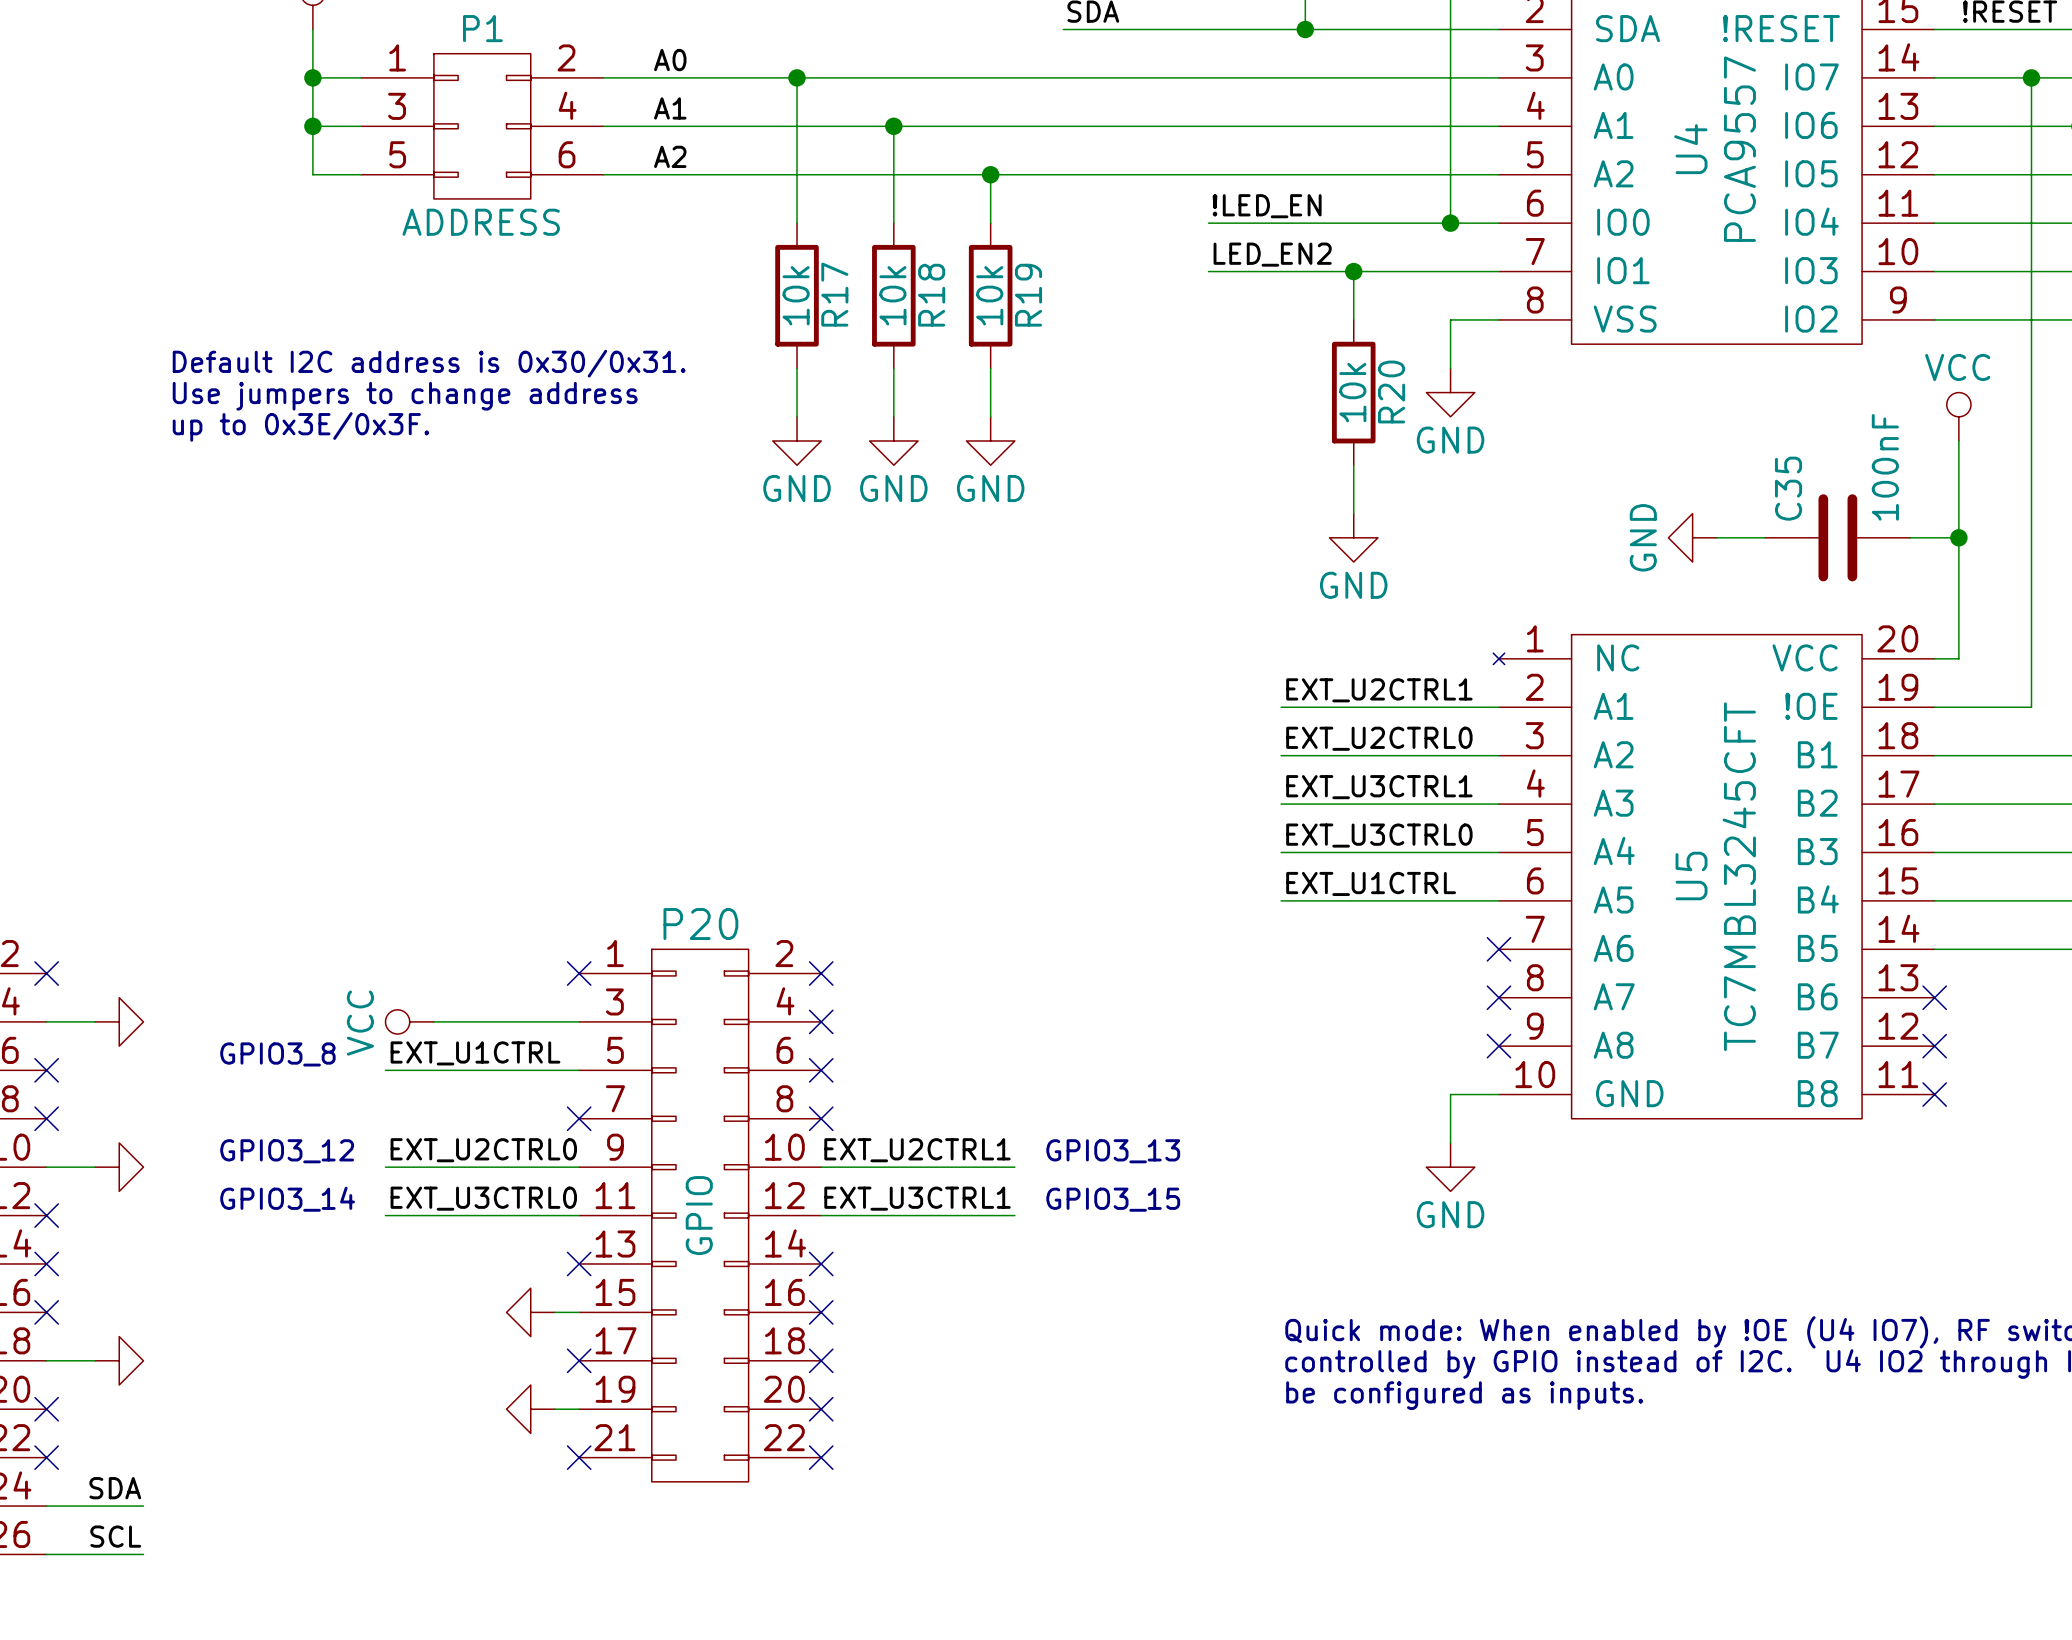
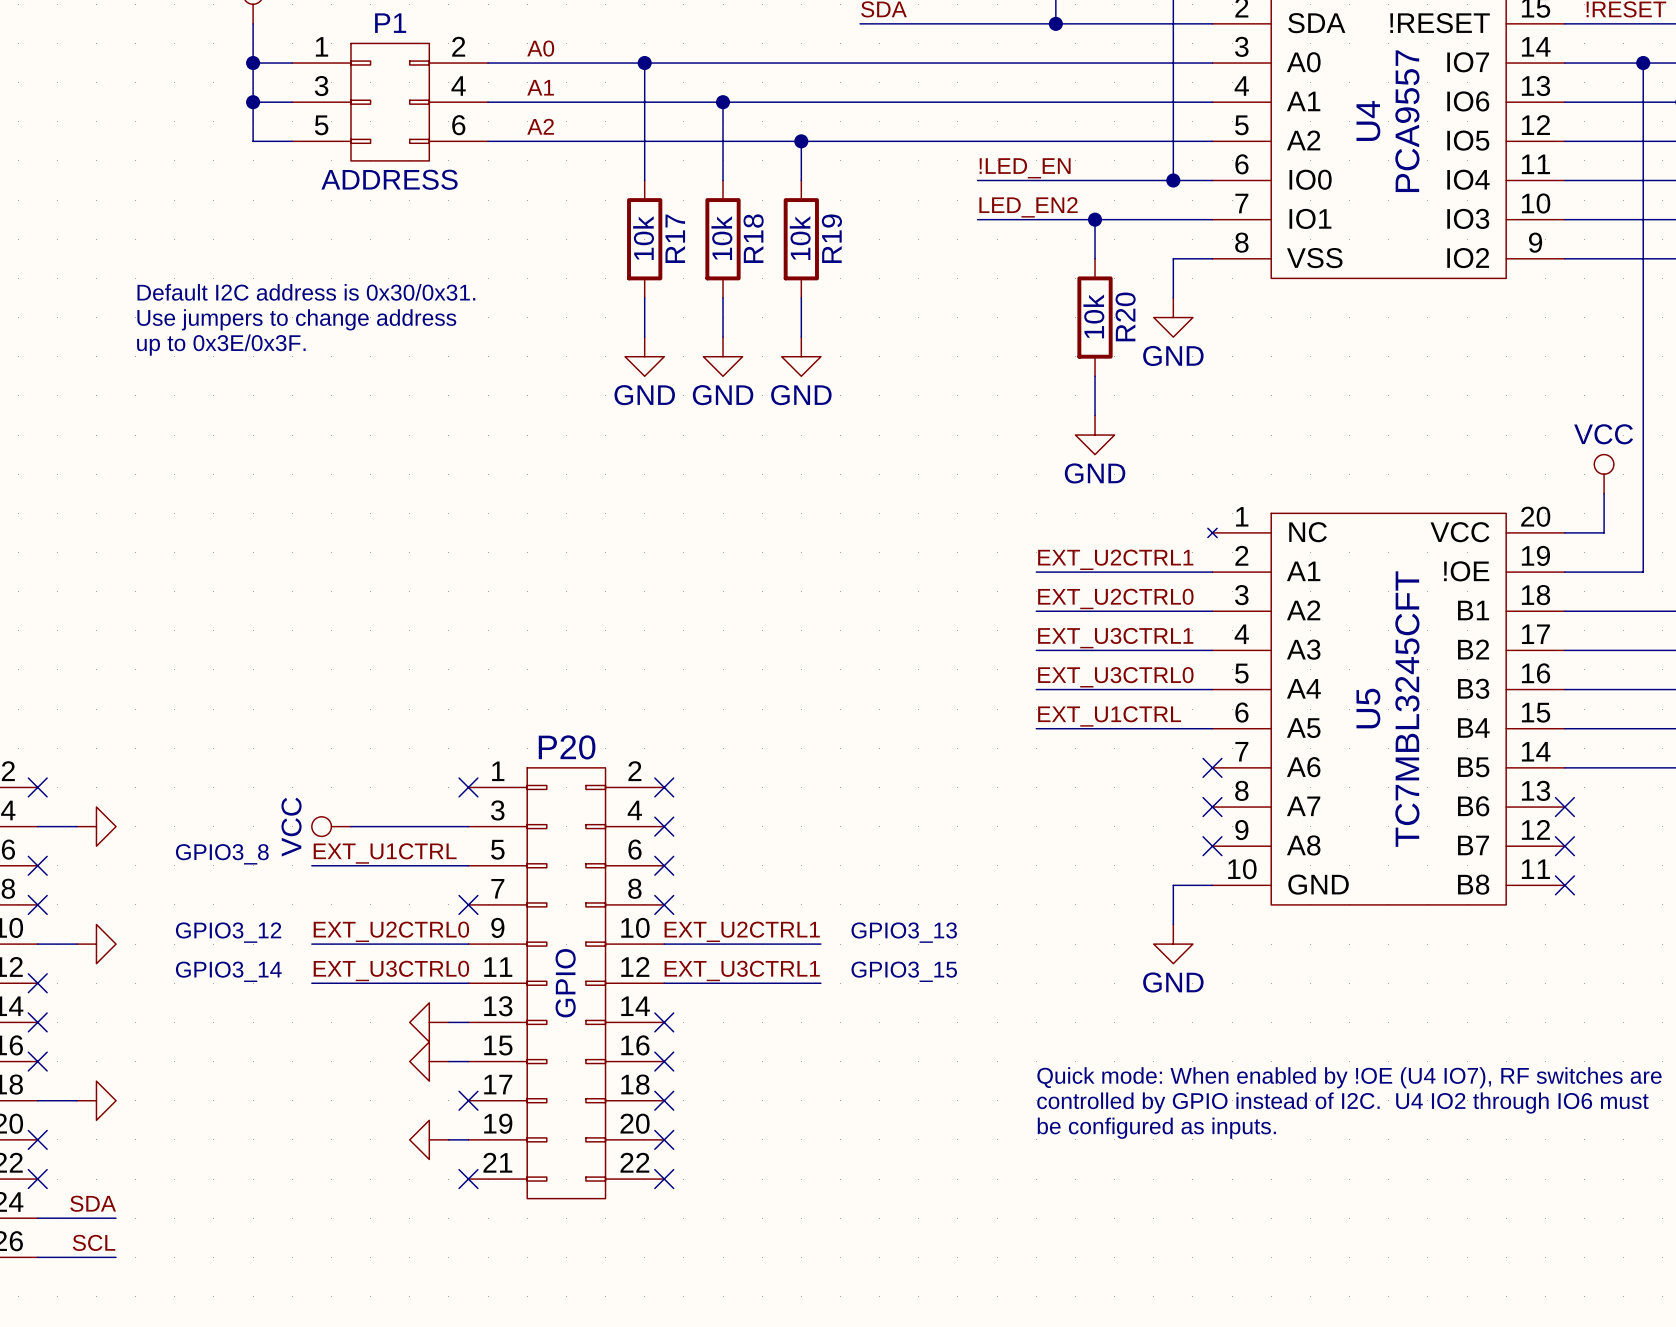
power symbol position: VCC (1958, 416) -> VCC (1604, 474)
wire: (1958, 440) (1958, 658) -> (1604, 493) (1604, 532) (1584, 532)
power symbol: GND (1692, 537) -> none
wire: (1716, 537) (1765, 537) -> none
C35: 100nF (1837, 537) -> none
wire: (1910, 537) (1958, 537) -> none
junction: (1958, 537) -> none
power symbol: none -> (429, 1022)
wire: none -> (448, 1022) (468, 1022)
no-connect mark: (579, 1263) -> none

